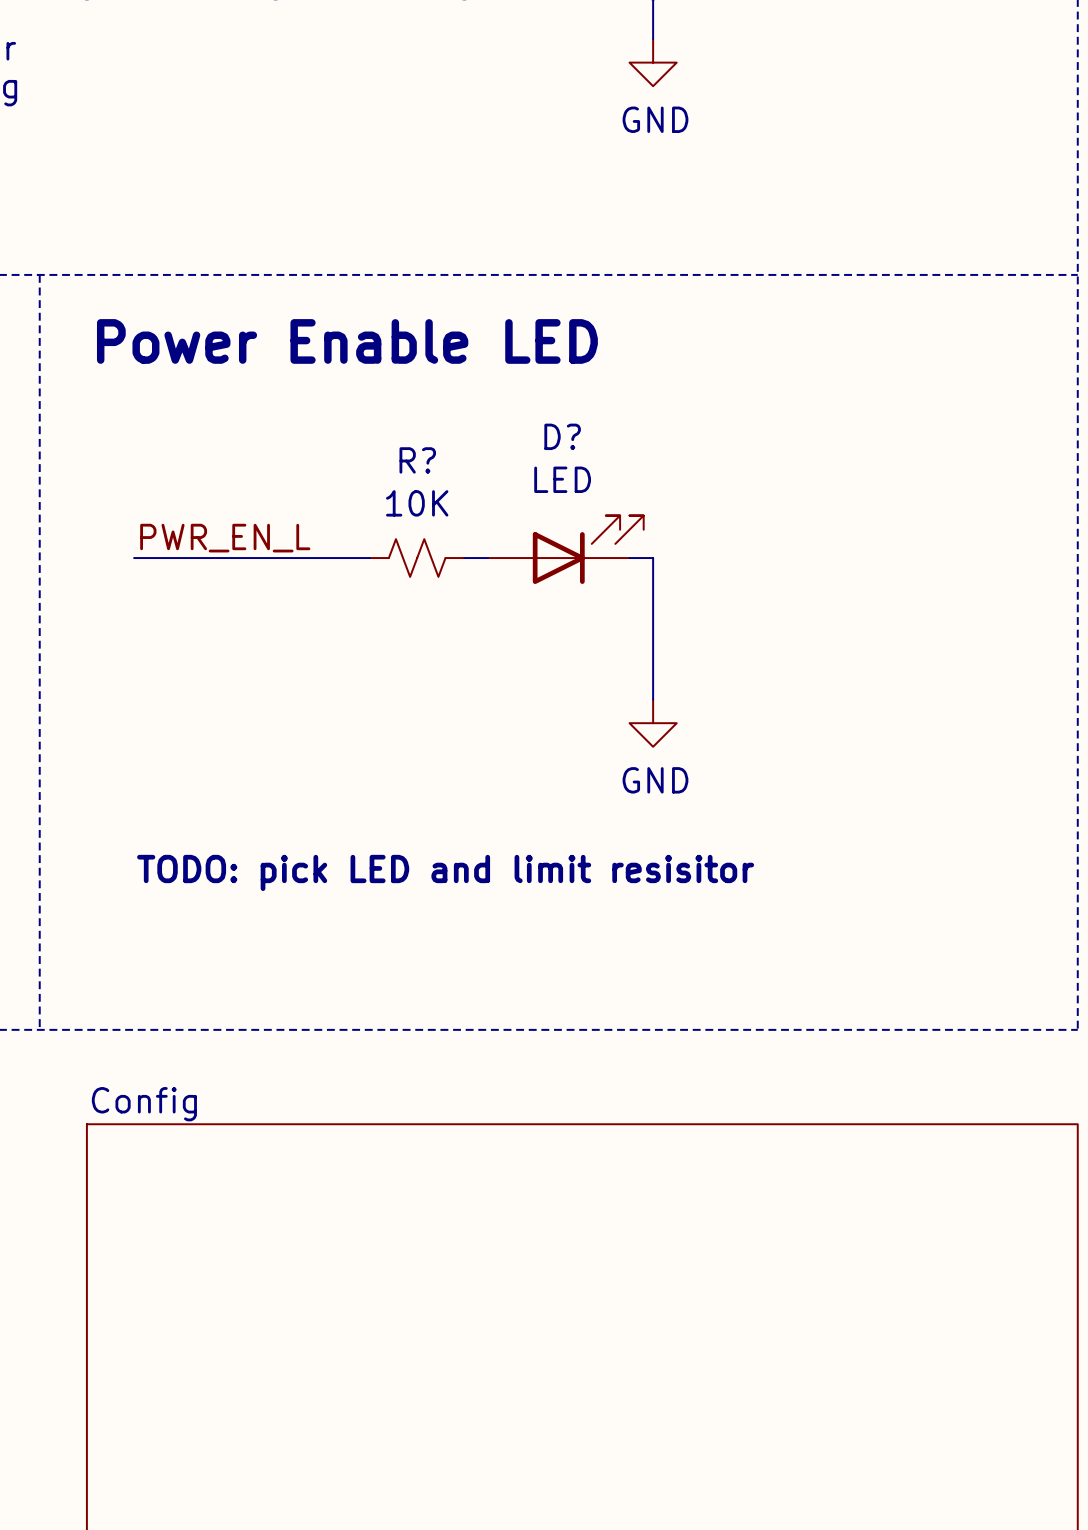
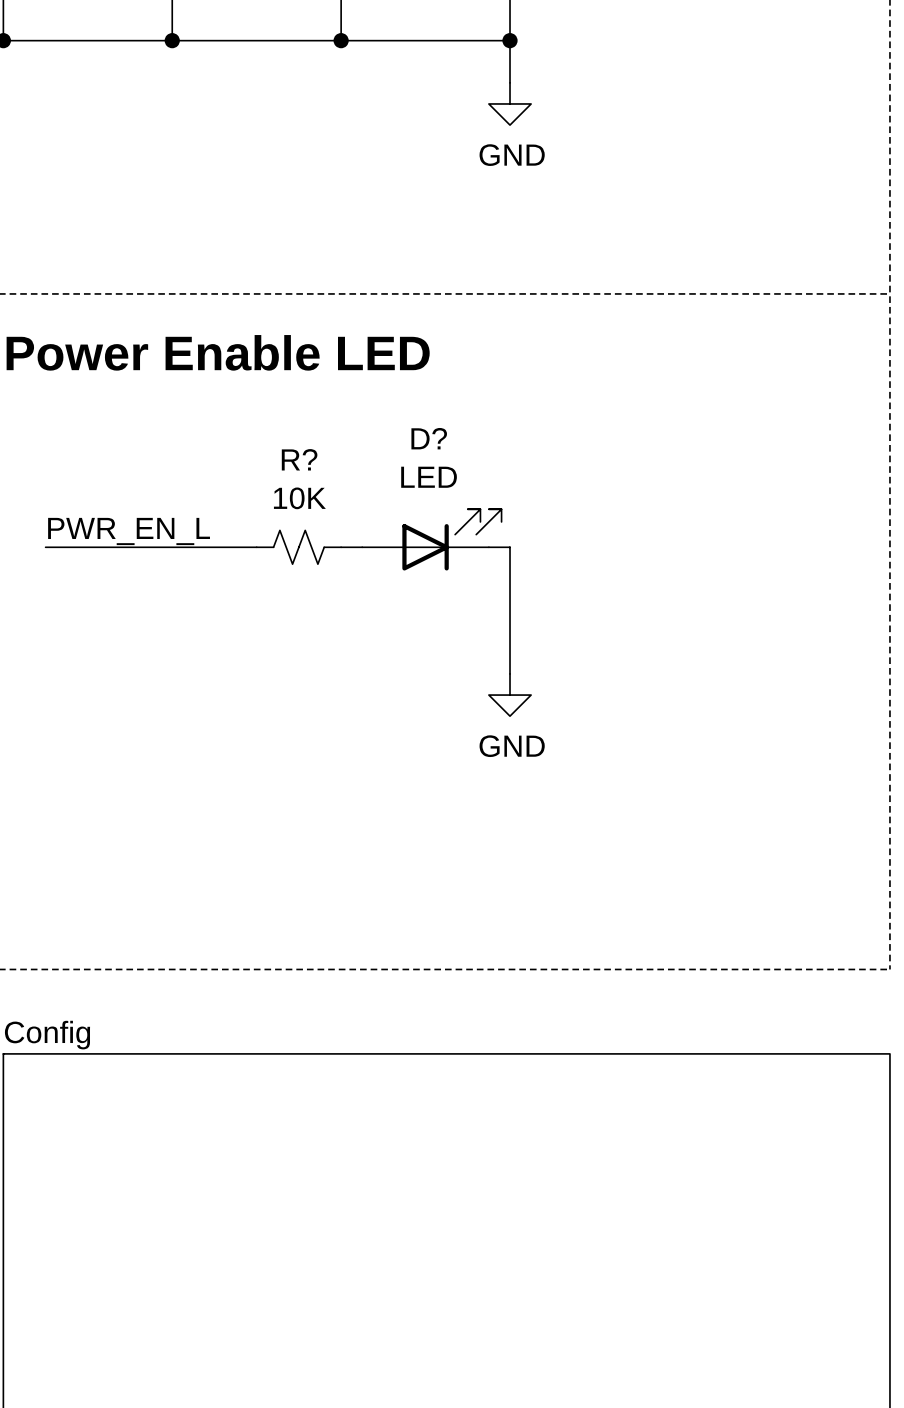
text: TODO: pick LED and limit resisitor (445, 872) -> none

